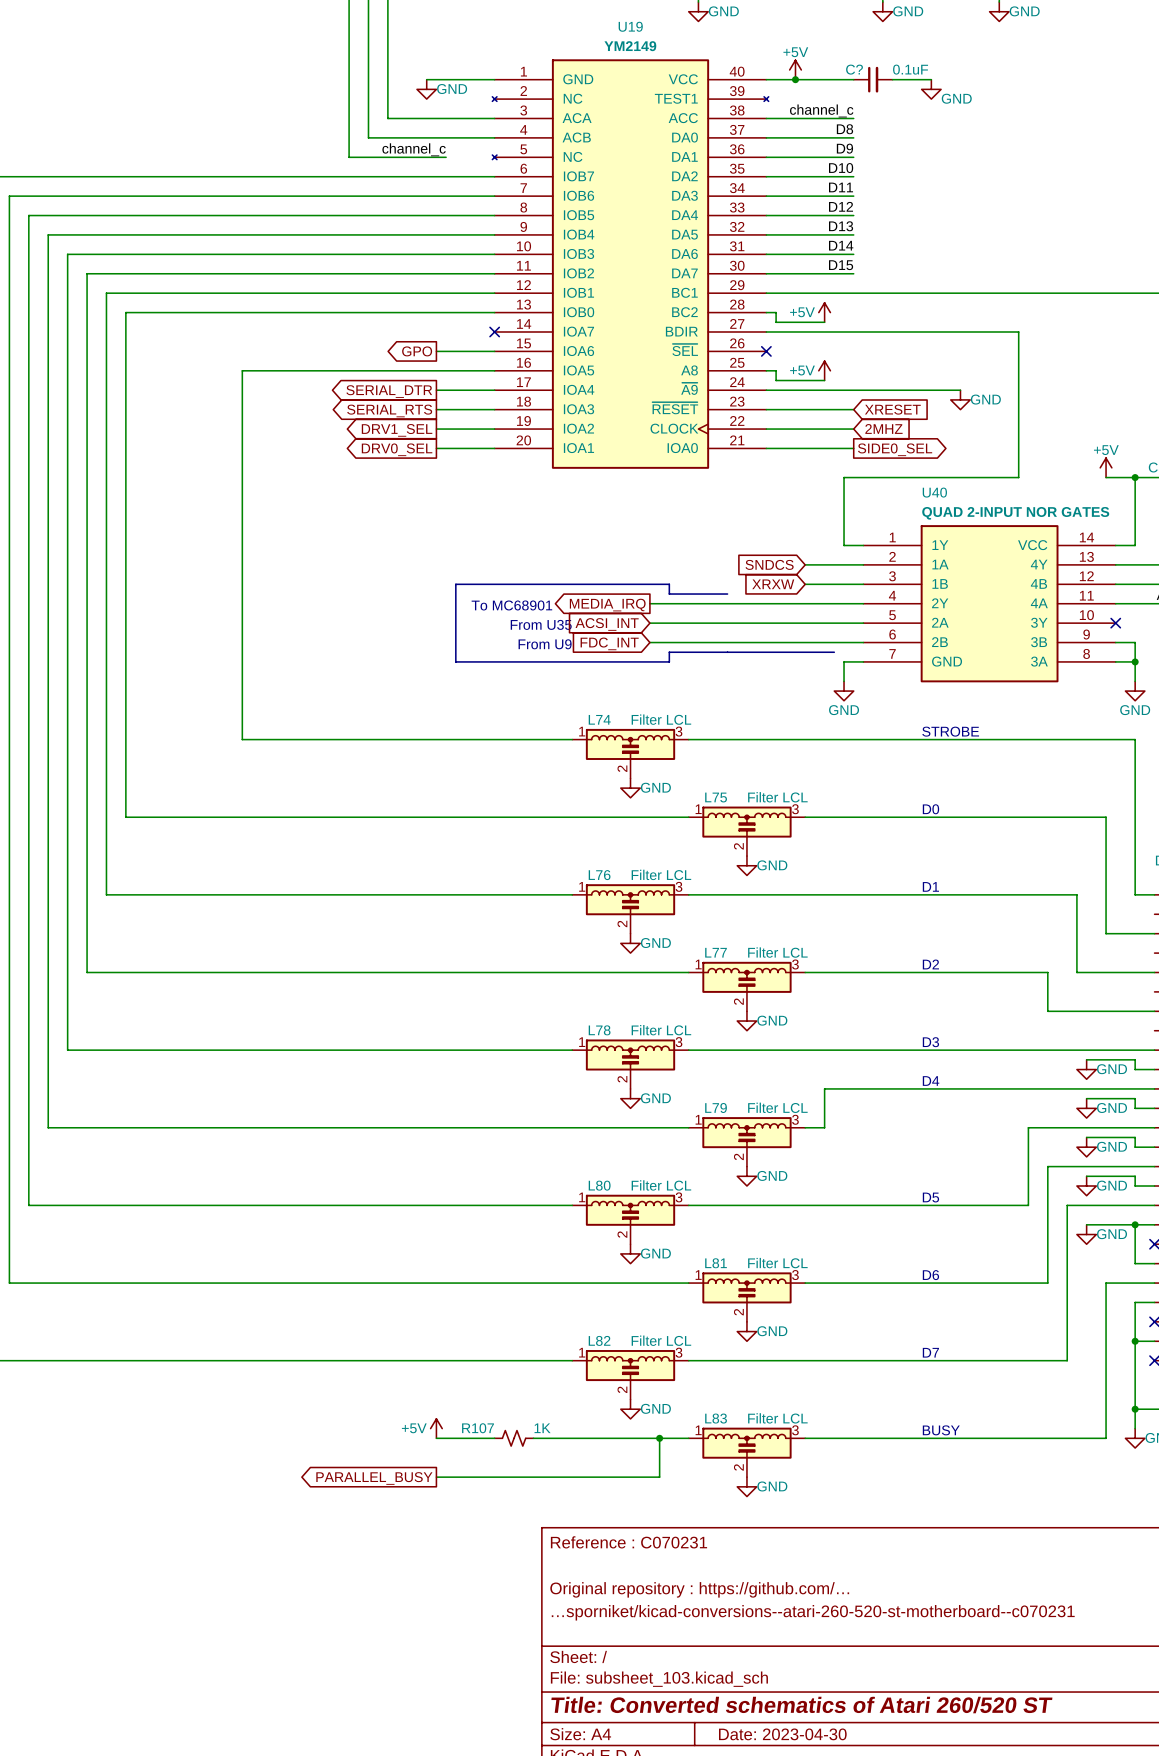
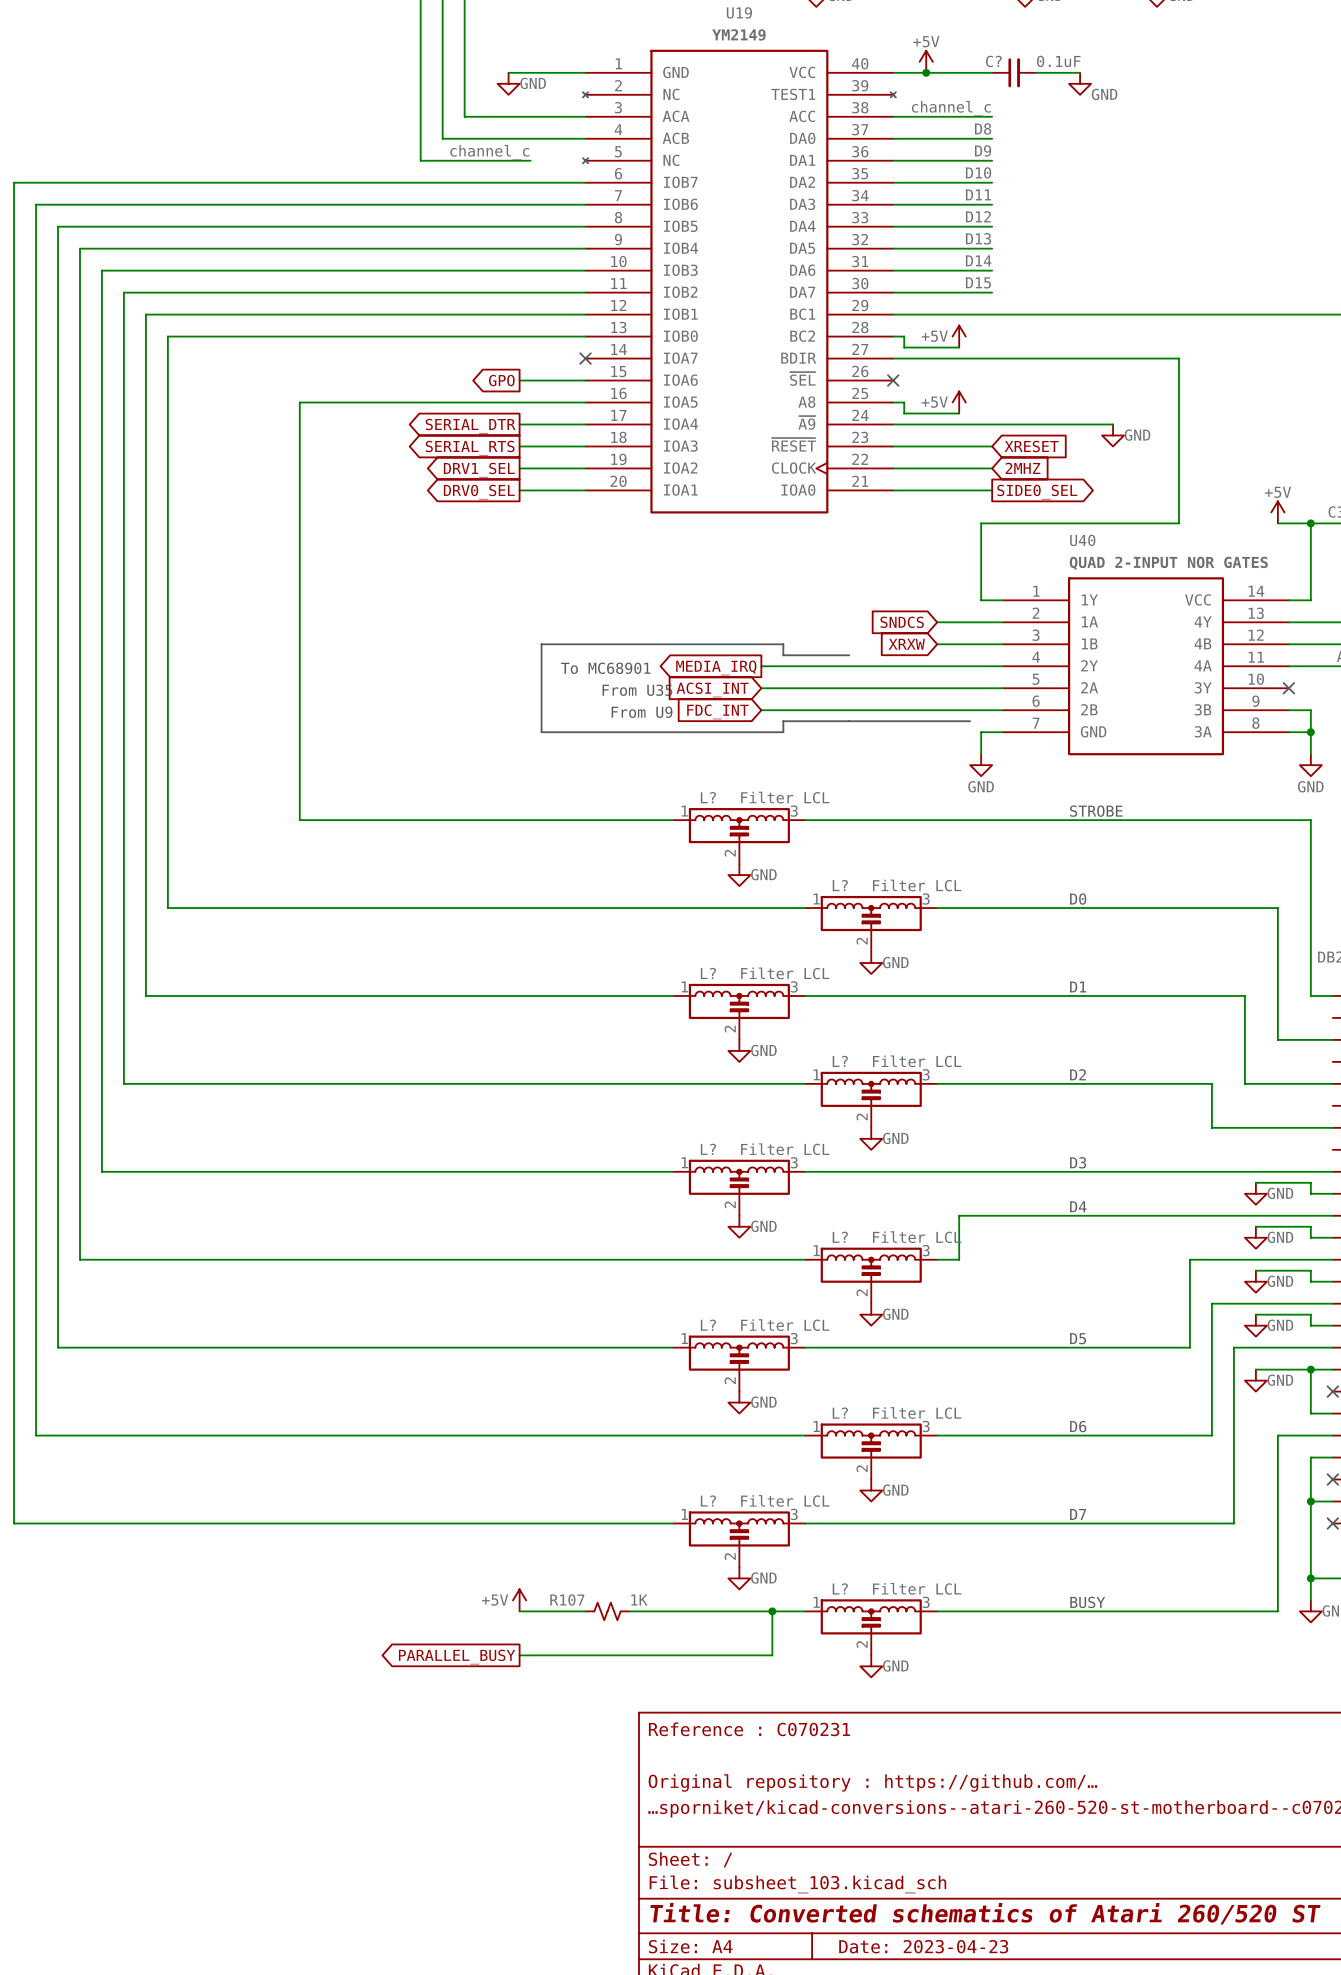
L74 name: L74 (599, 719) -> L? (708, 797)
L75 name: L75 (716, 797) -> L? (840, 885)
L76 name: L76 (599, 875) -> L? (708, 973)
L77 name: L77 (716, 952) -> L? (840, 1061)
L78 name: L78 (599, 1030) -> L? (708, 1149)
L79 name: L79 (716, 1108) -> L? (840, 1237)
L80 name: L80 (599, 1185) -> L? (708, 1325)
L81 name: L81 (716, 1263) -> L? (840, 1413)
L82 name: L82 (599, 1340) -> L? (708, 1500)
L83 name: L83 (716, 1418) -> L? (840, 1588)
title block: Date: 2023-04-30 (782, 1734) -> Date: 2023-04-23 (923, 1946)

